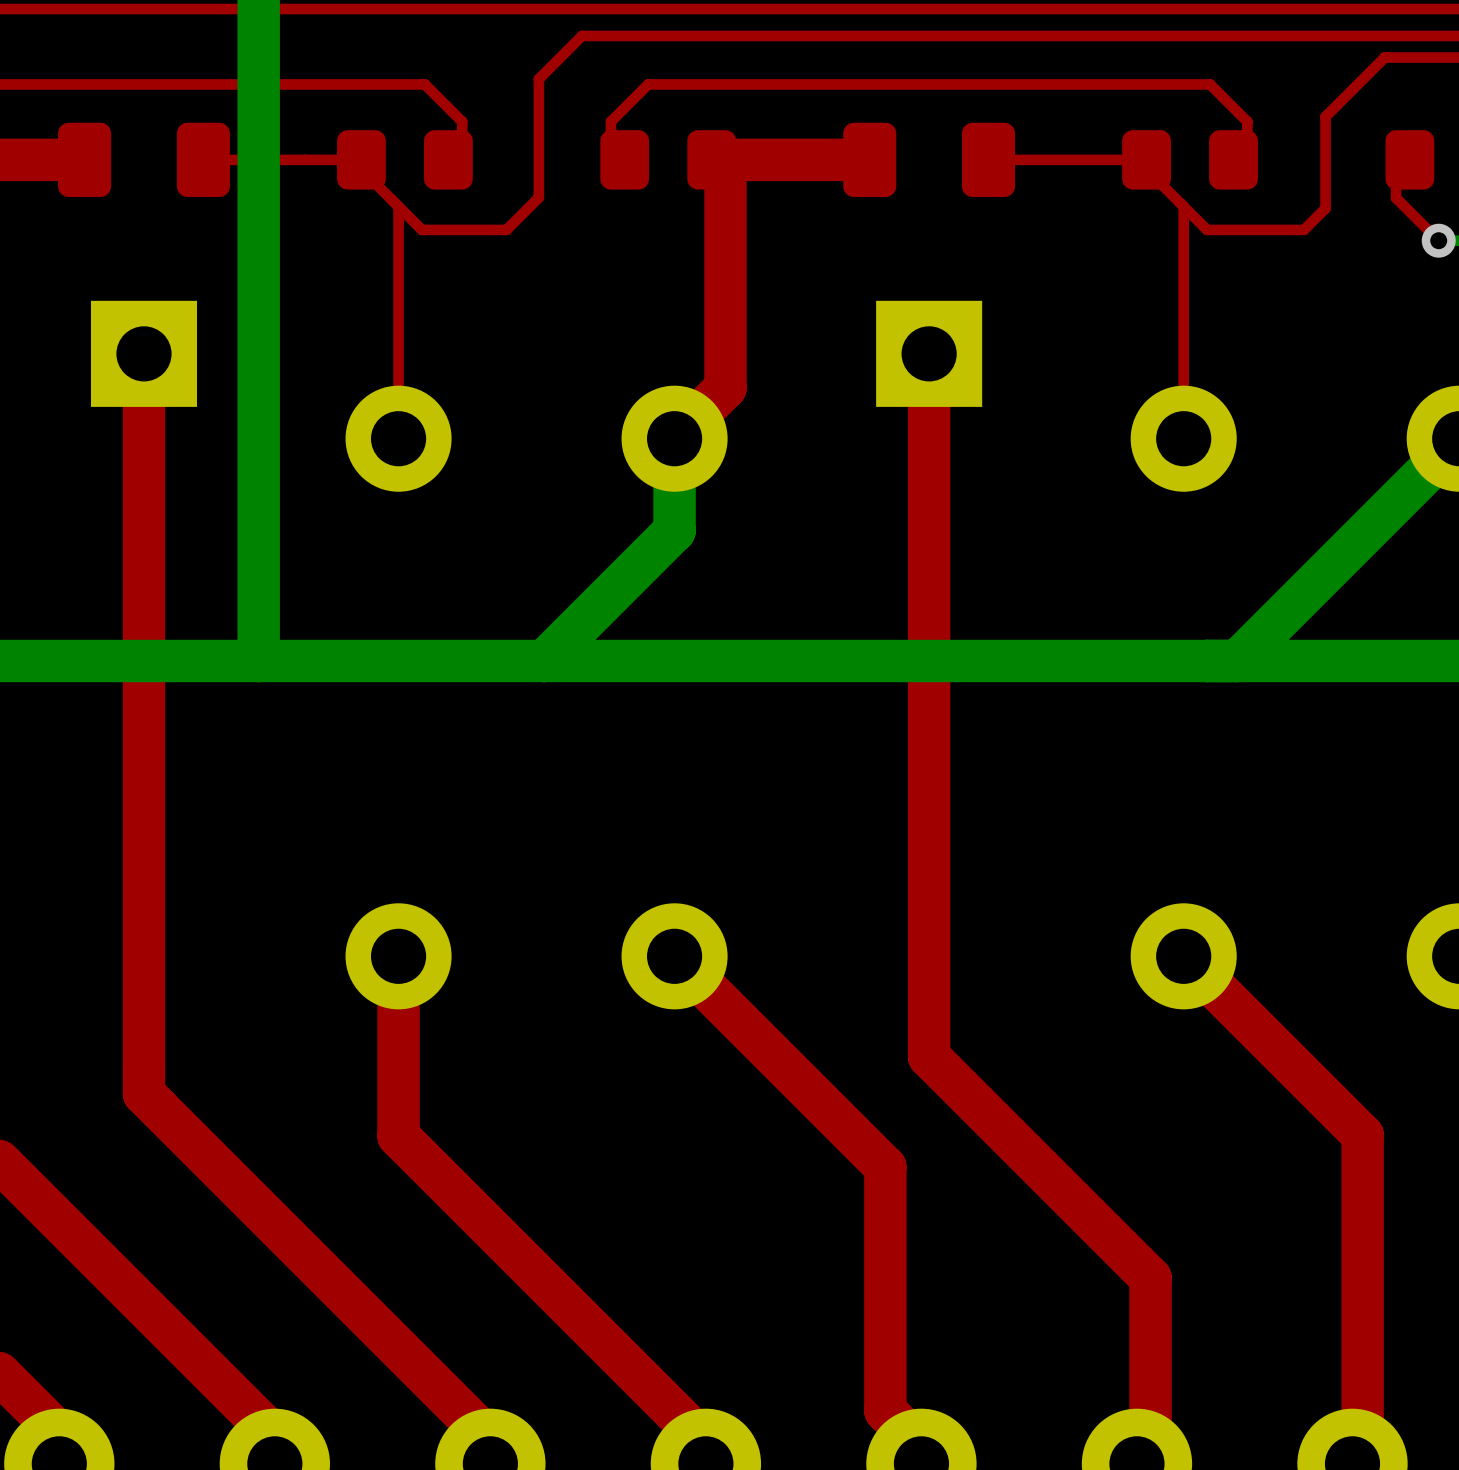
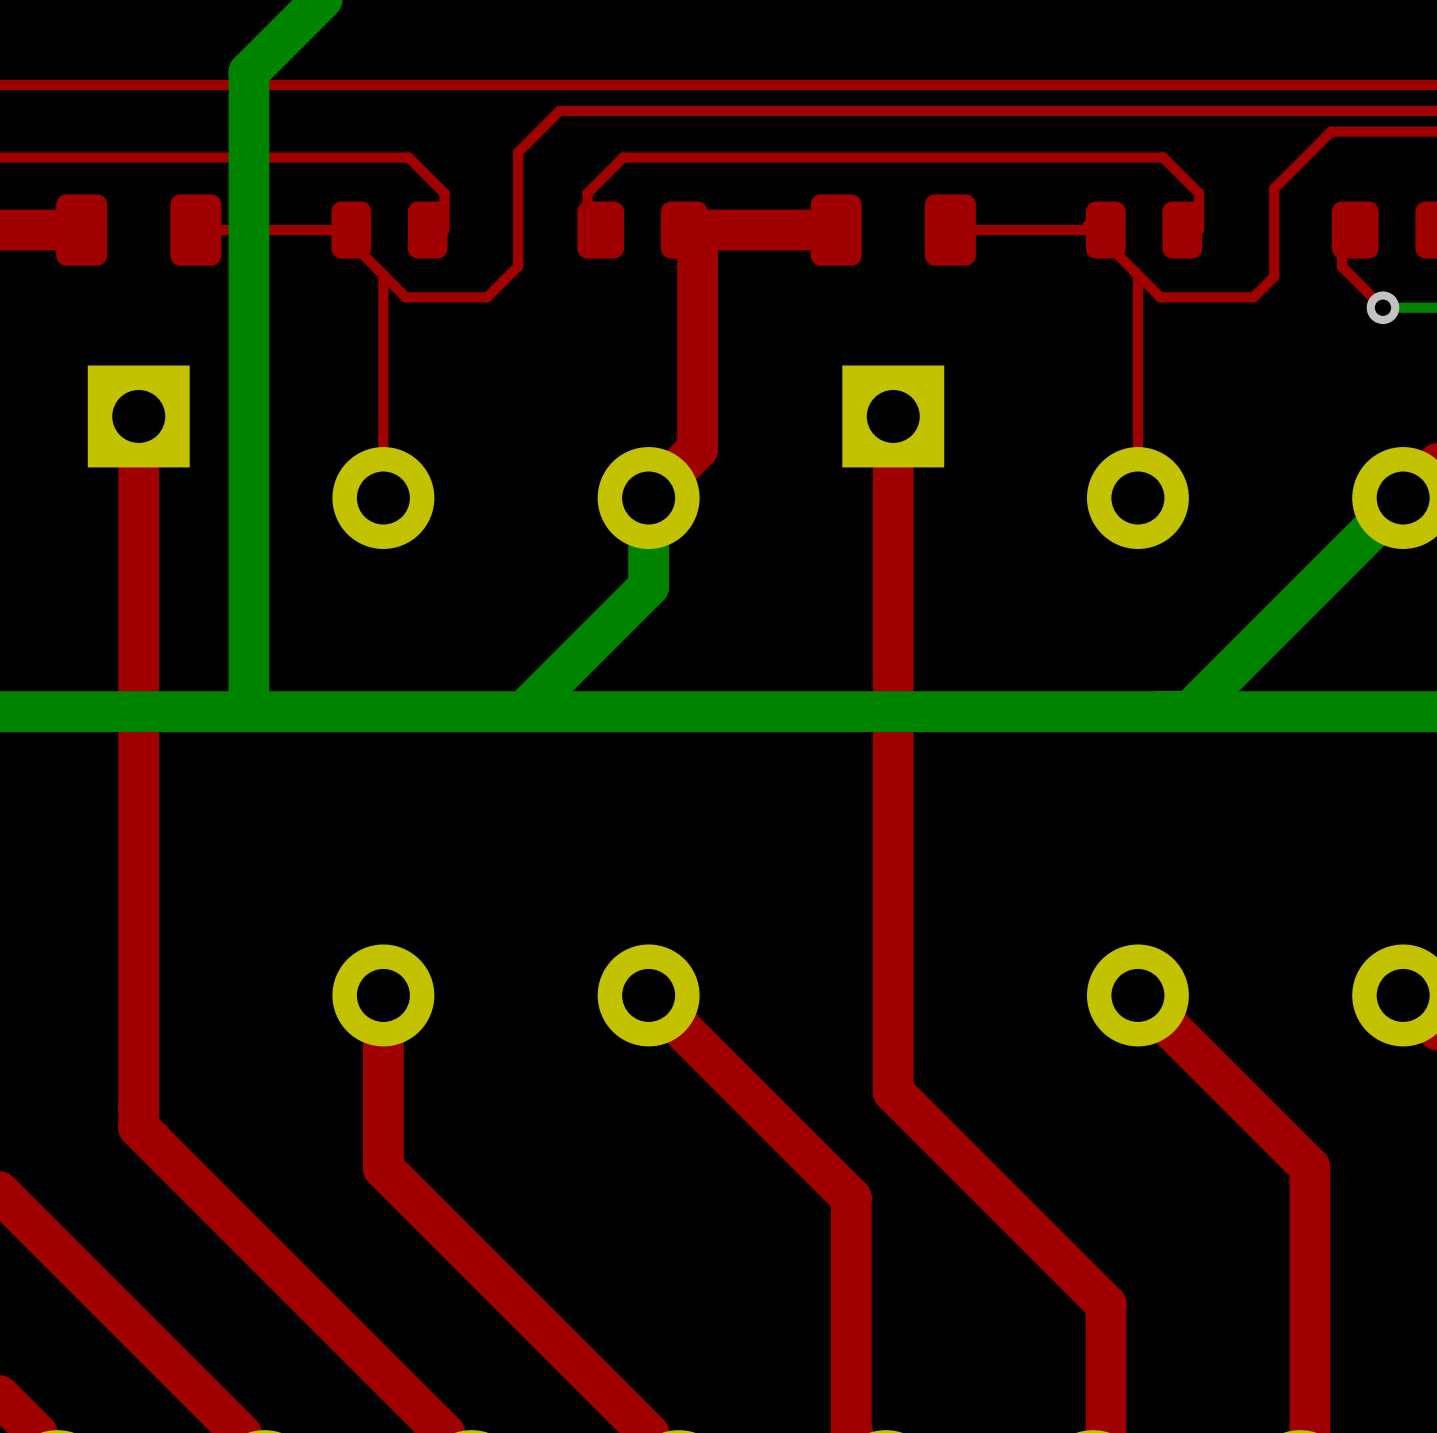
part footprint: [337, 130, 473, 190] -> [331, 201, 448, 259]
part footprint: [1122, 130, 1258, 190] -> [1085, 201, 1203, 259]

